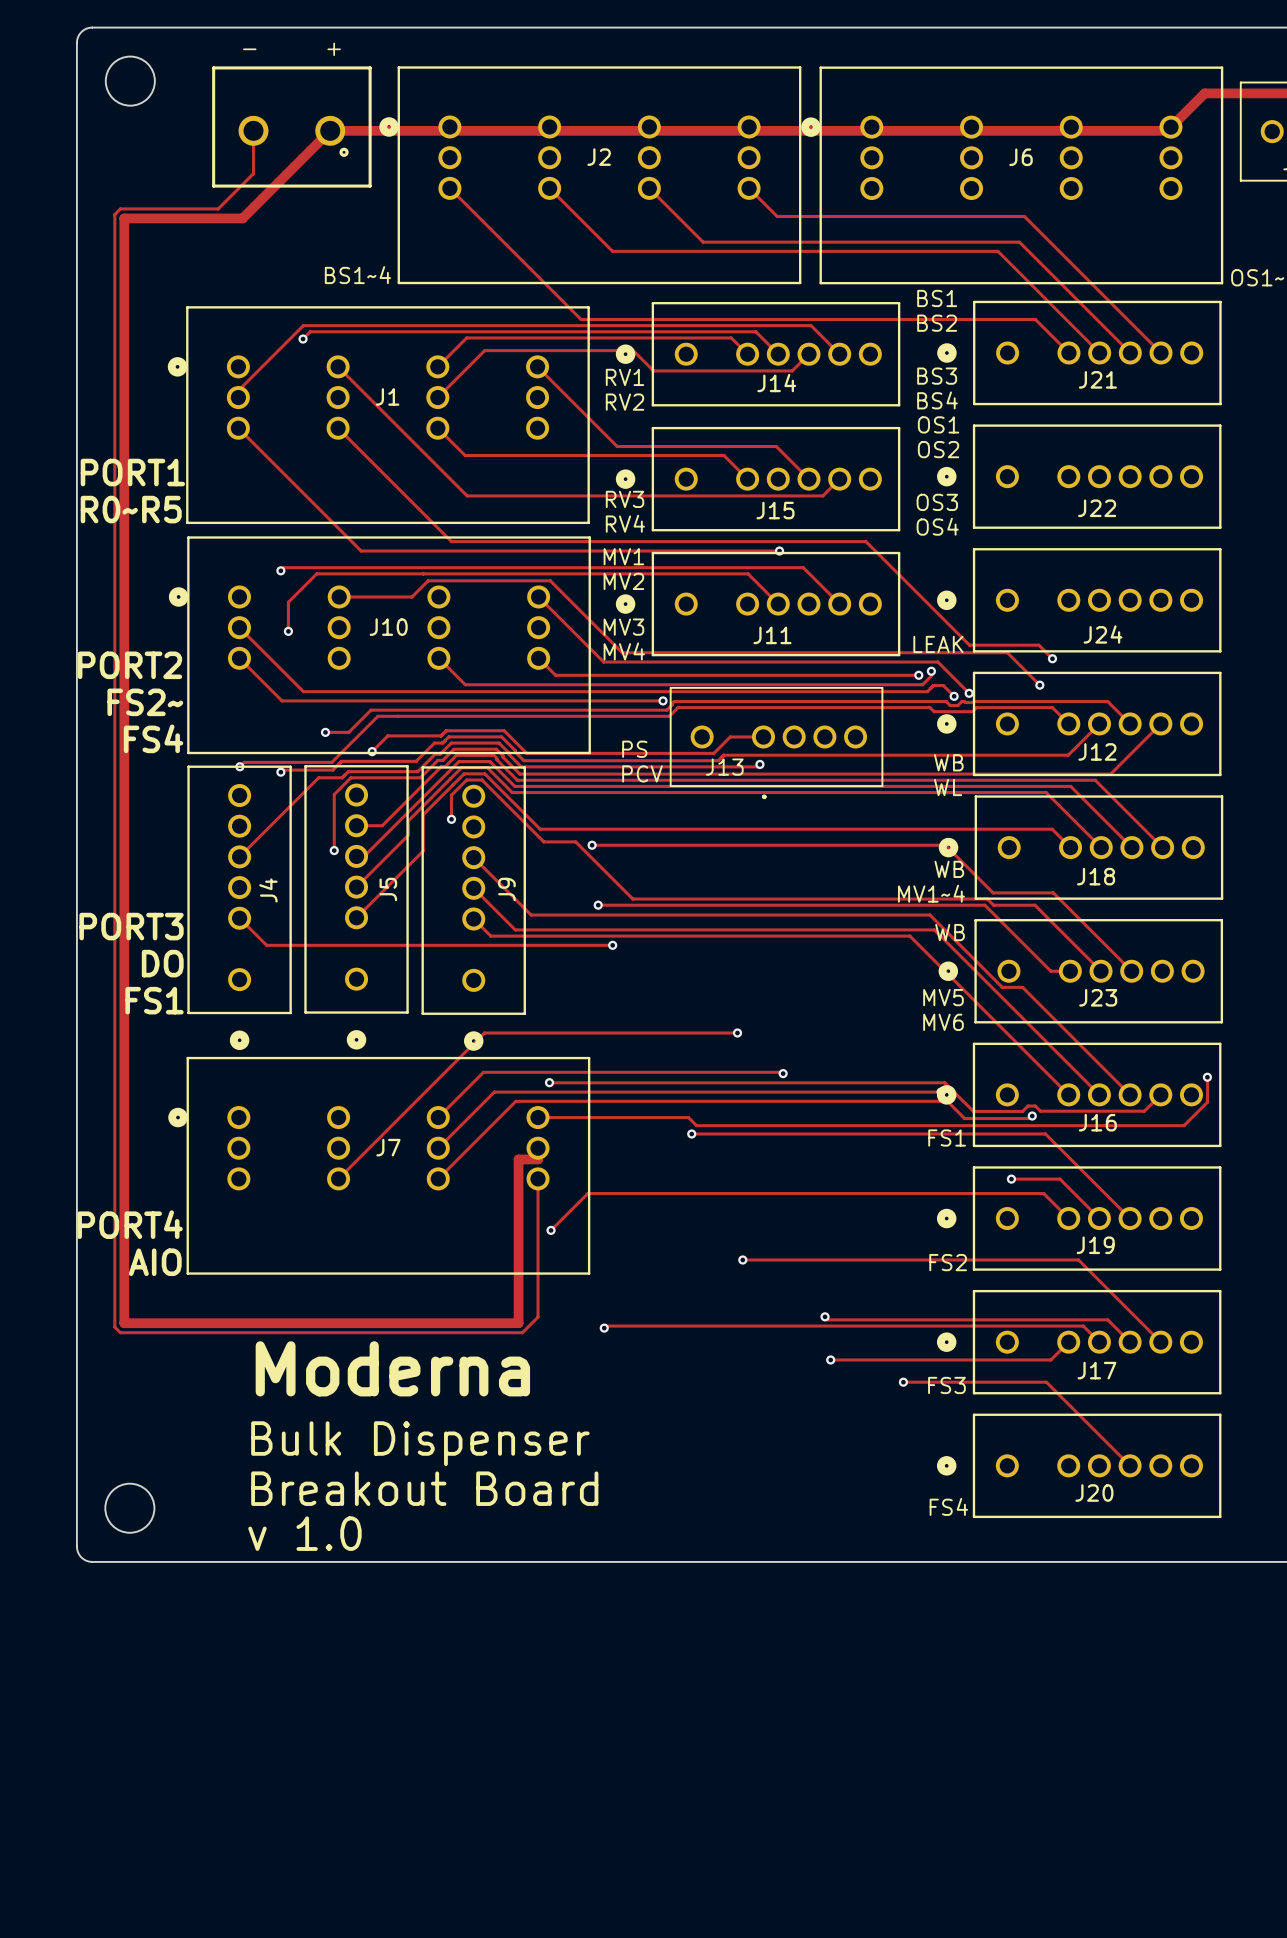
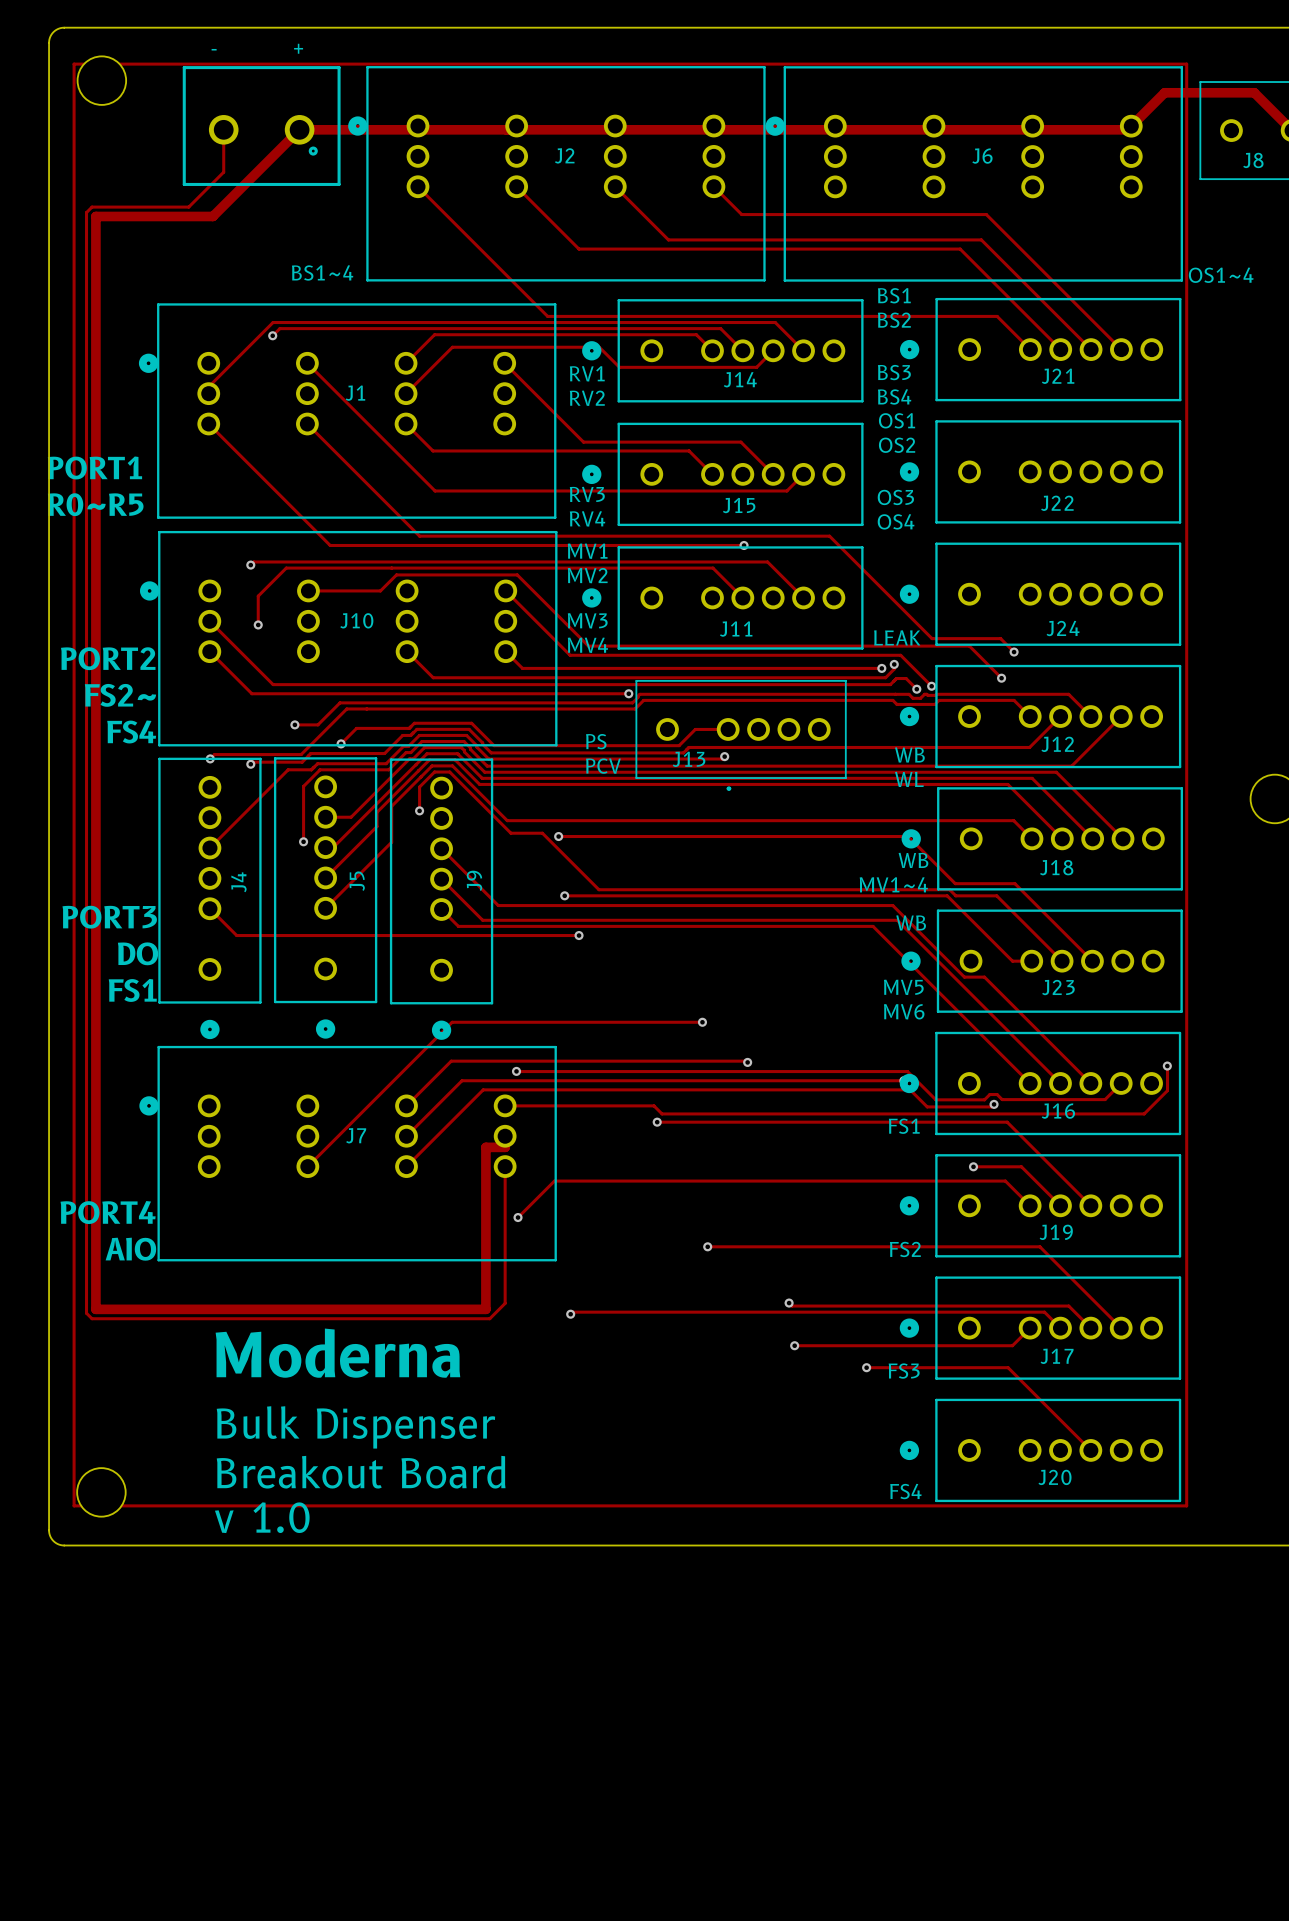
track: none -> (74, 64) (1186, 64) (1186, 1505) (74, 1505) (74, 64)

